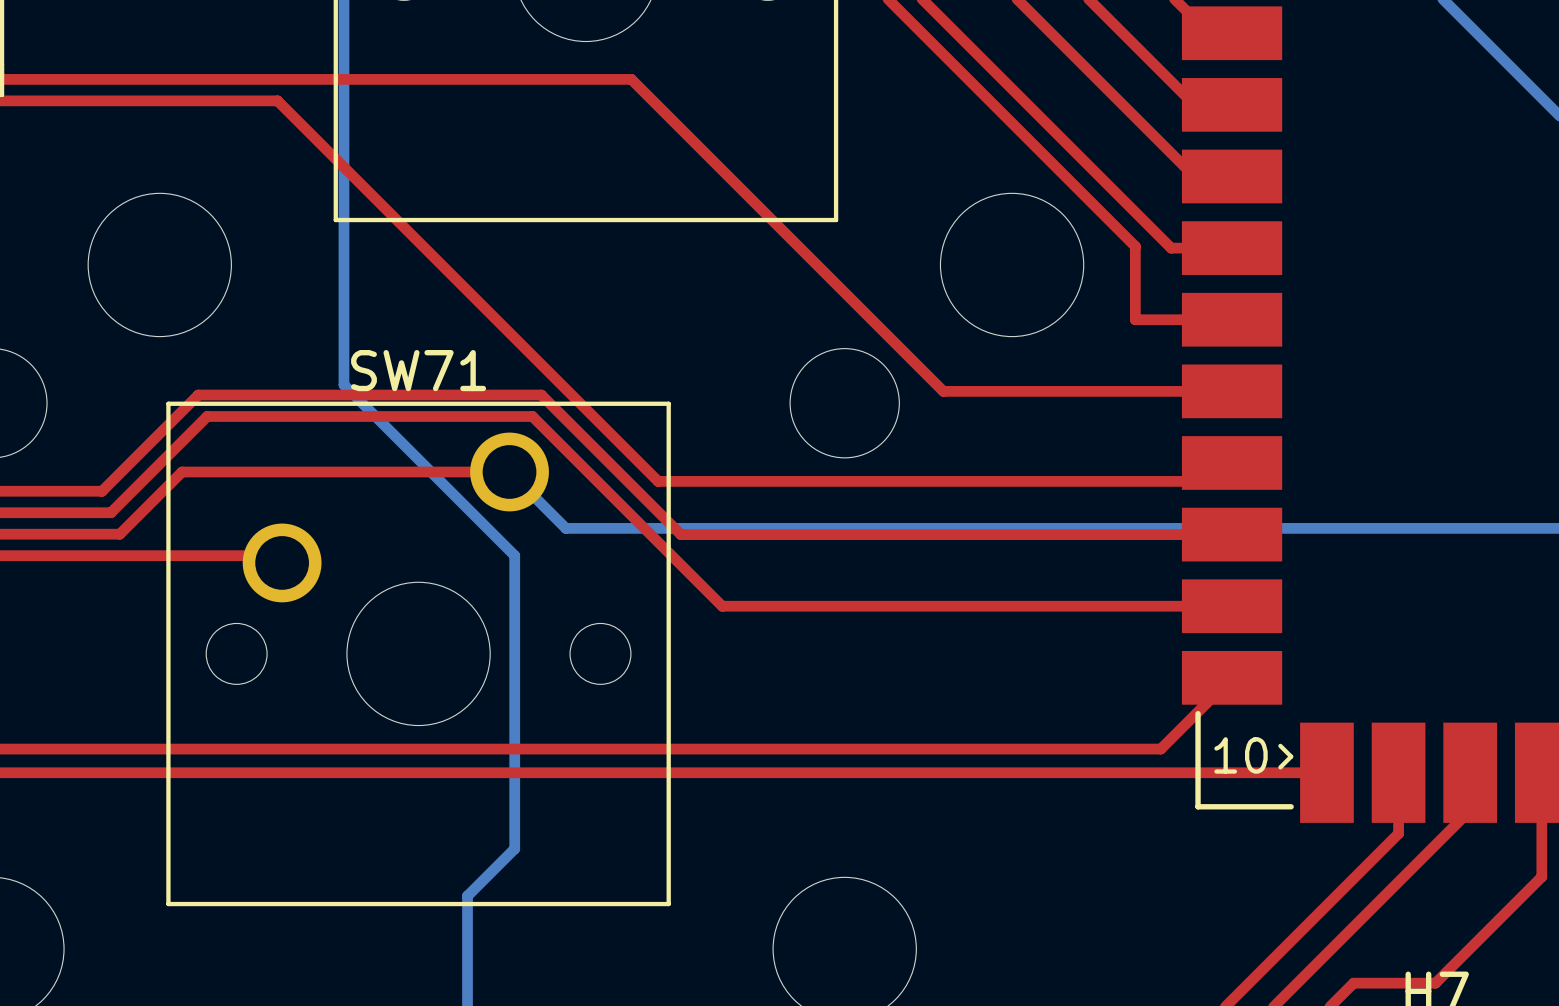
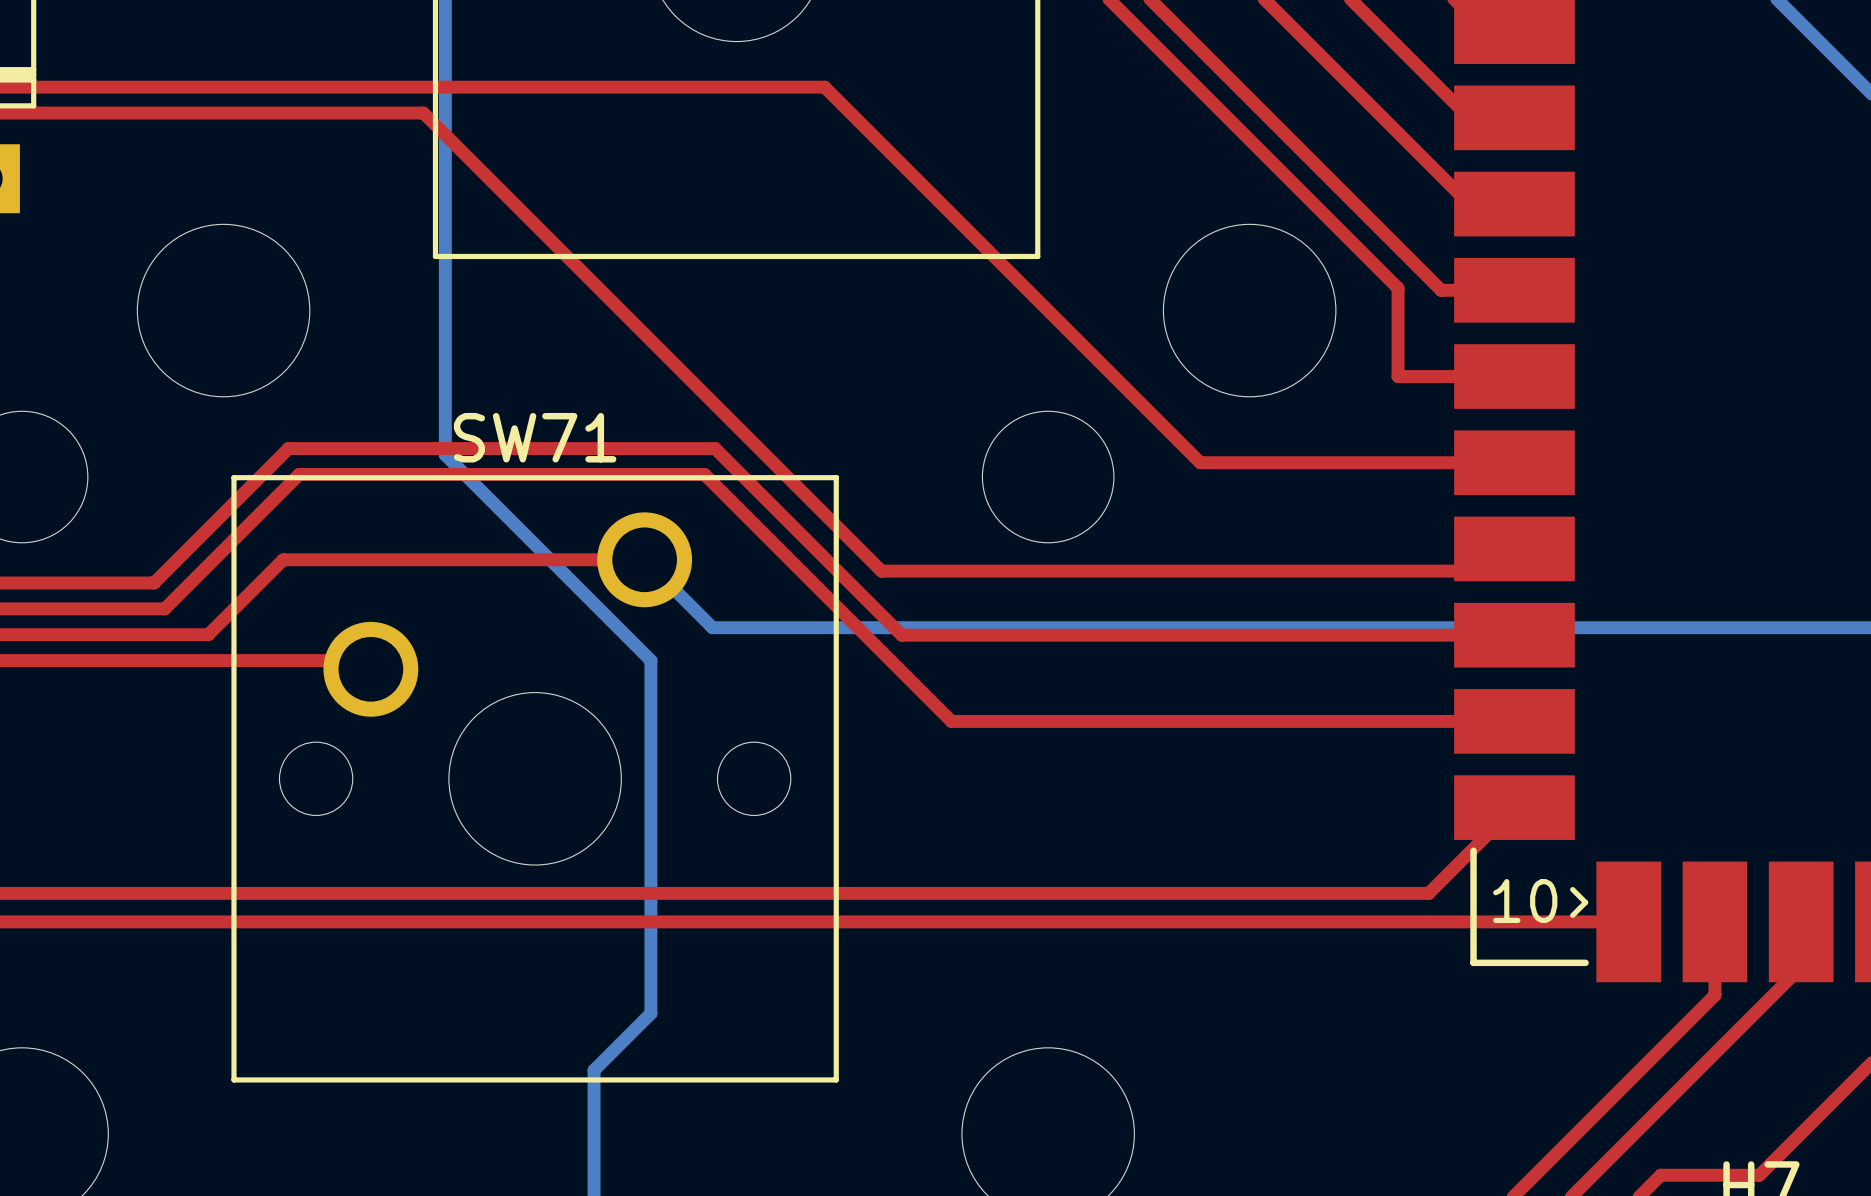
top track: (631, 79) (943, 391) (971, 391) -> (791, 87) (824, 87) (1200, 462)
top track: (277, 100) (658, 481) (706, 481) -> (365, 113) (423, 113) (881, 571)
top track: (198, 395) (541, 395) (680, 534) (723, 534) -> (269, 467) (288, 448) (715, 448) (901, 635)
top track: (207, 416) (532, 416) (722, 606) (764, 606) -> (280, 492) (299, 474) (704, 474) (951, 721)
top track: (209, 471) (182, 471) (119, 534) -> (283, 559) (208, 634) (175, 634)

